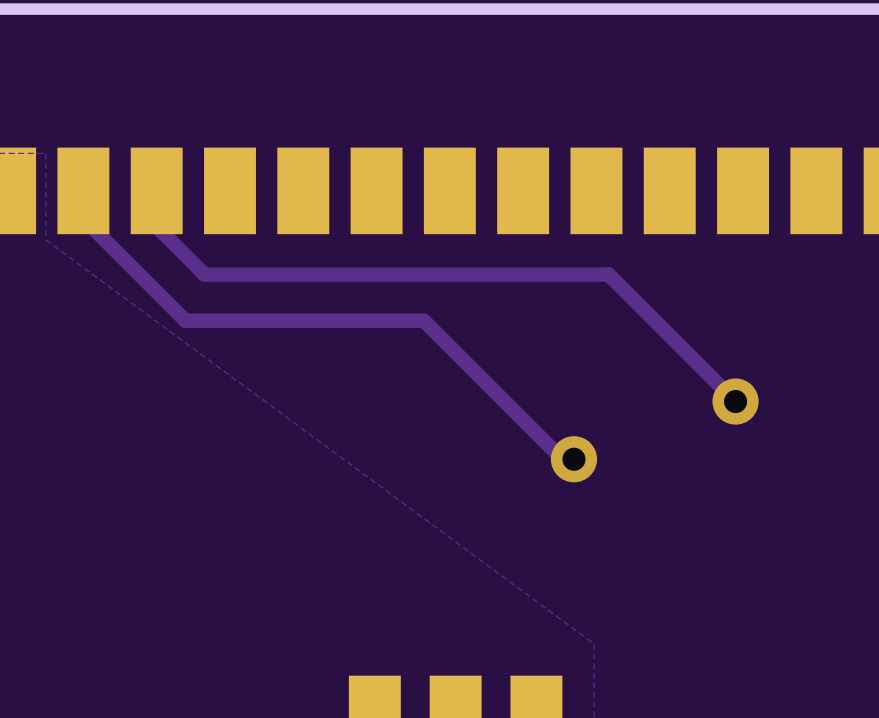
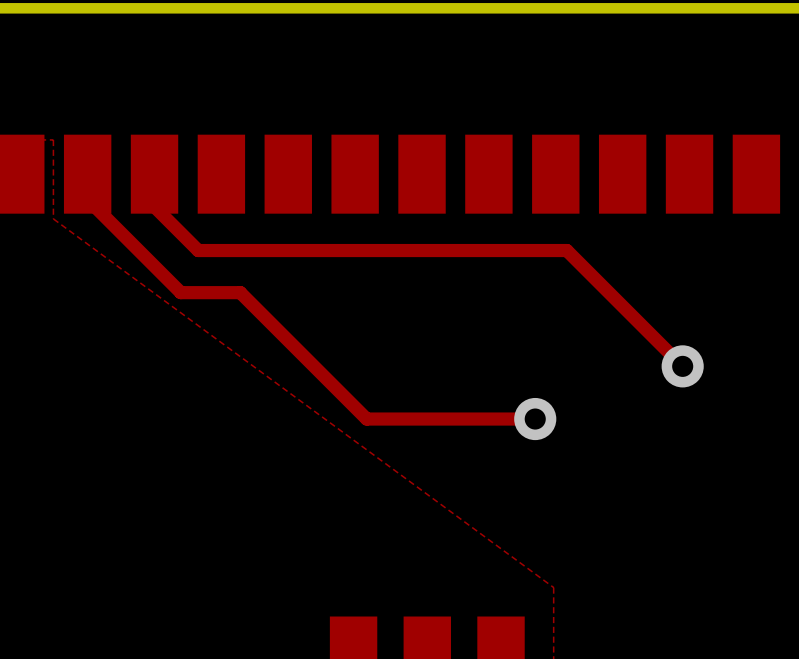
track: (250, 320) (423, 320) (562, 459) -> (240, 292) (366, 419) (524, 419)

